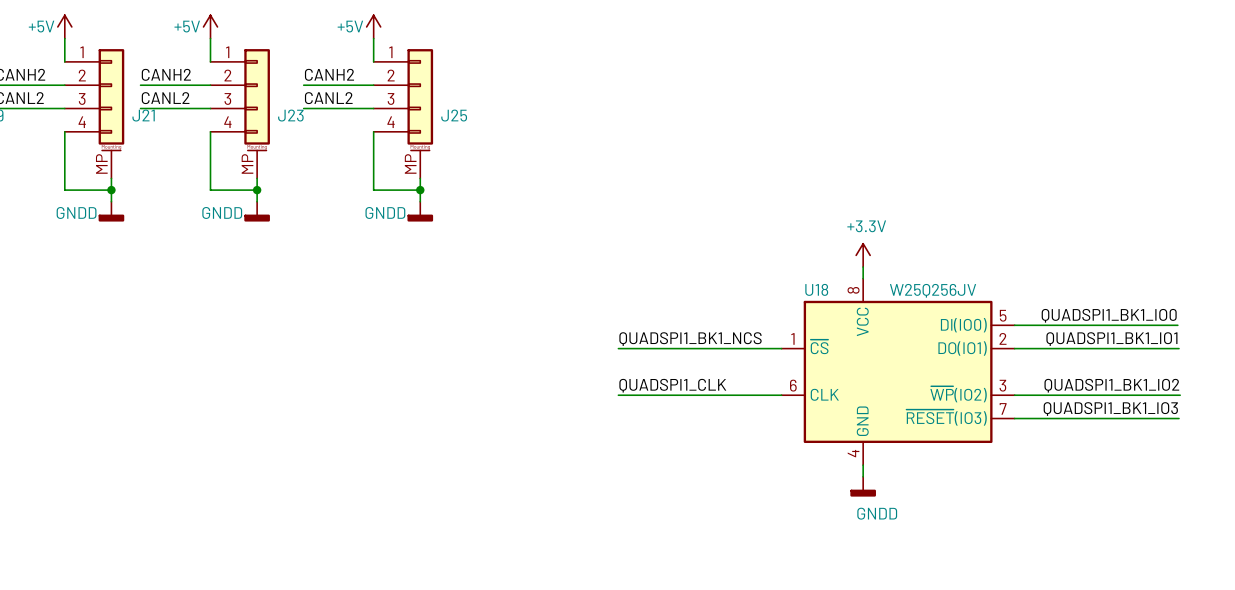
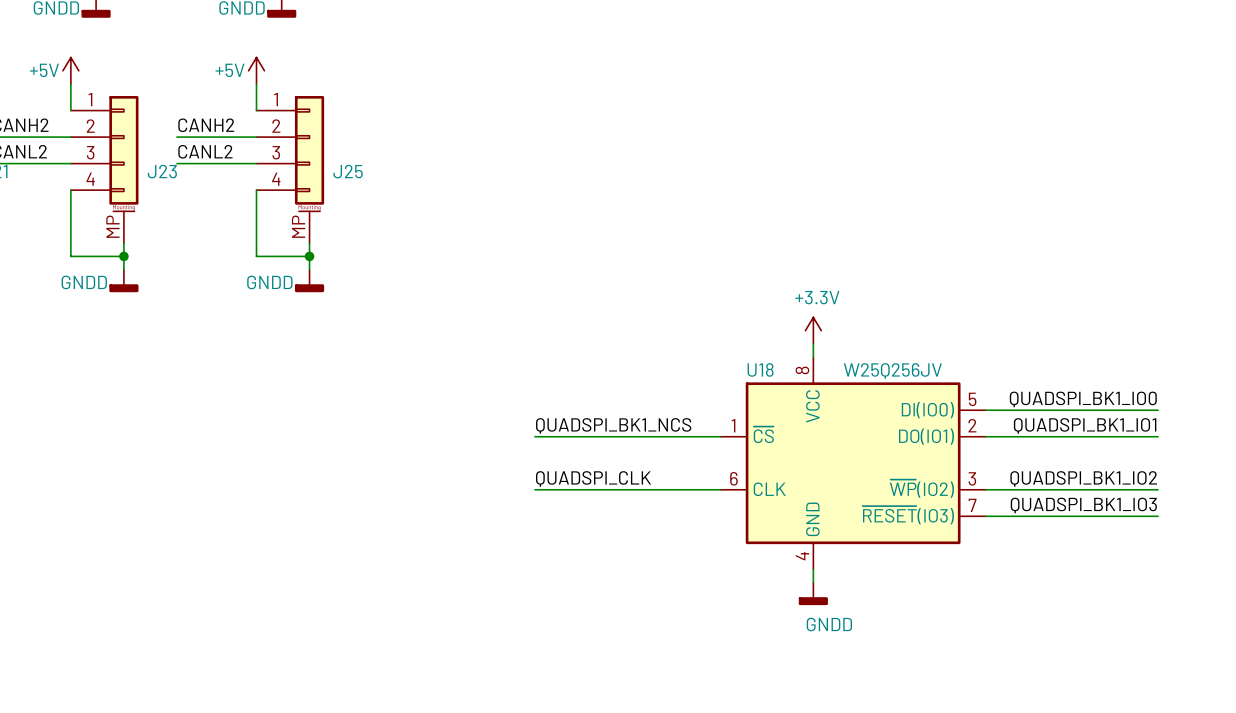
label: QUADSPI1_BK1_IO0 (1109, 315) -> QUADSPI_BK1_IO0 (1083, 399)
wire: (1166, 325) (1177, 325) -> none
label: QUADSPI1_BK1_NCS (690, 339) -> QUADSPI_BK1_NCS (613, 425)
label: QUADSPI1_BK1_IO1 (1111, 339) -> QUADSPI_BK1_IO1 (1085, 425)
wire: (1166, 348) (1178, 348) -> none
label: QUADSPI1_CLK (672, 385) -> QUADSPI_CLK (593, 478)
label: none -> QUADSPI_BK1_IO2 (1083, 478)
label: QUADSPI1_BK1_IO2 (1111, 385) -> none
wire: (1166, 395) (1180, 395) -> none
label: QUADSPI1_BK1_IO3 (1110, 409) -> QUADSPI_BK1_IO3 (1083, 505)
wire: (1166, 418) (1178, 418) -> none

